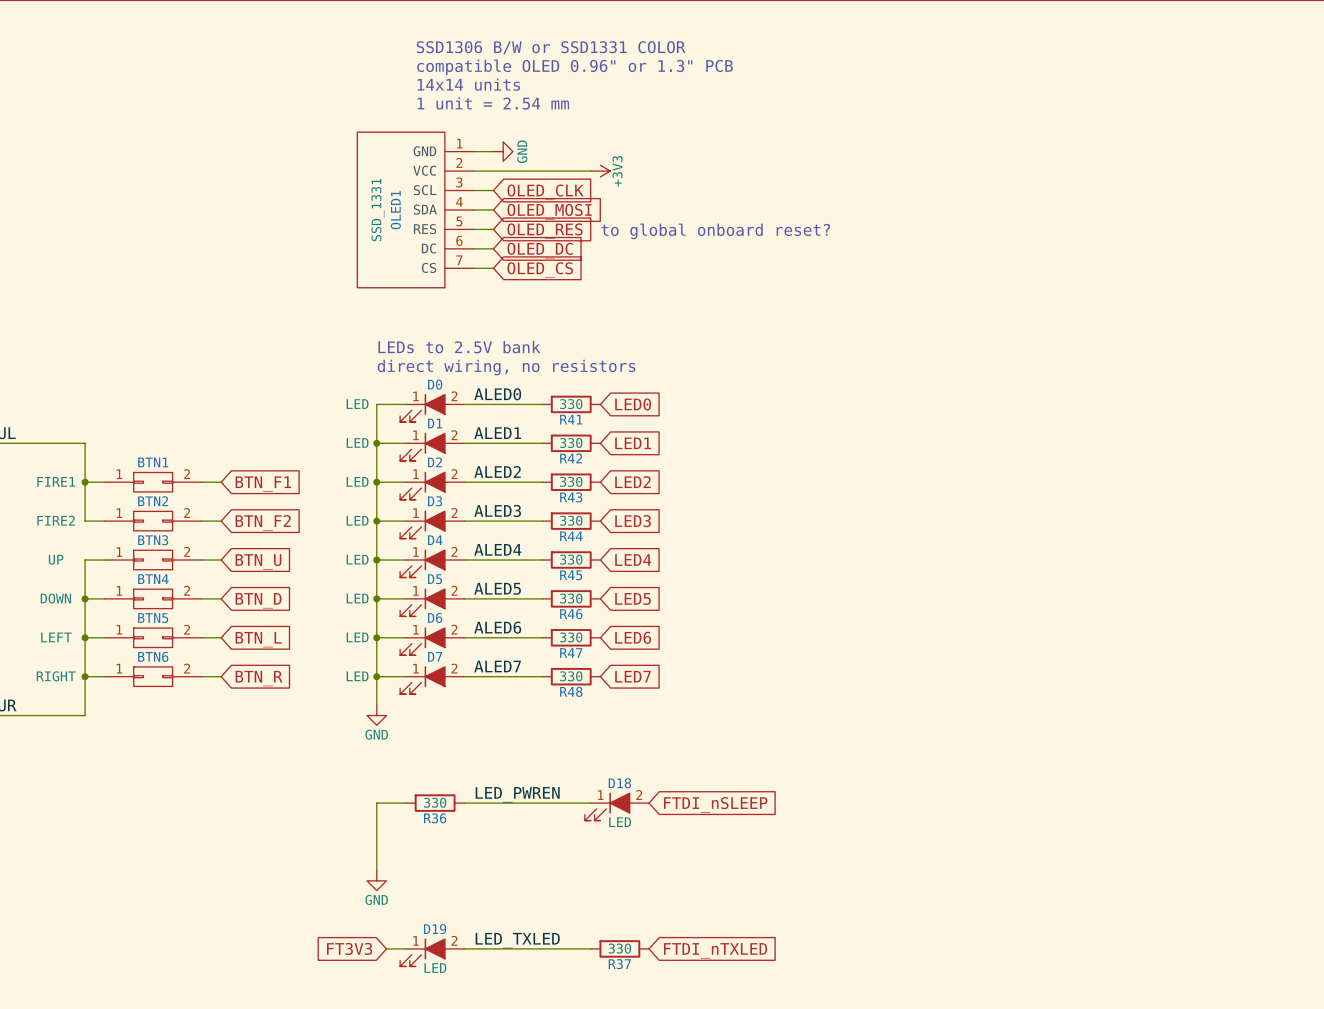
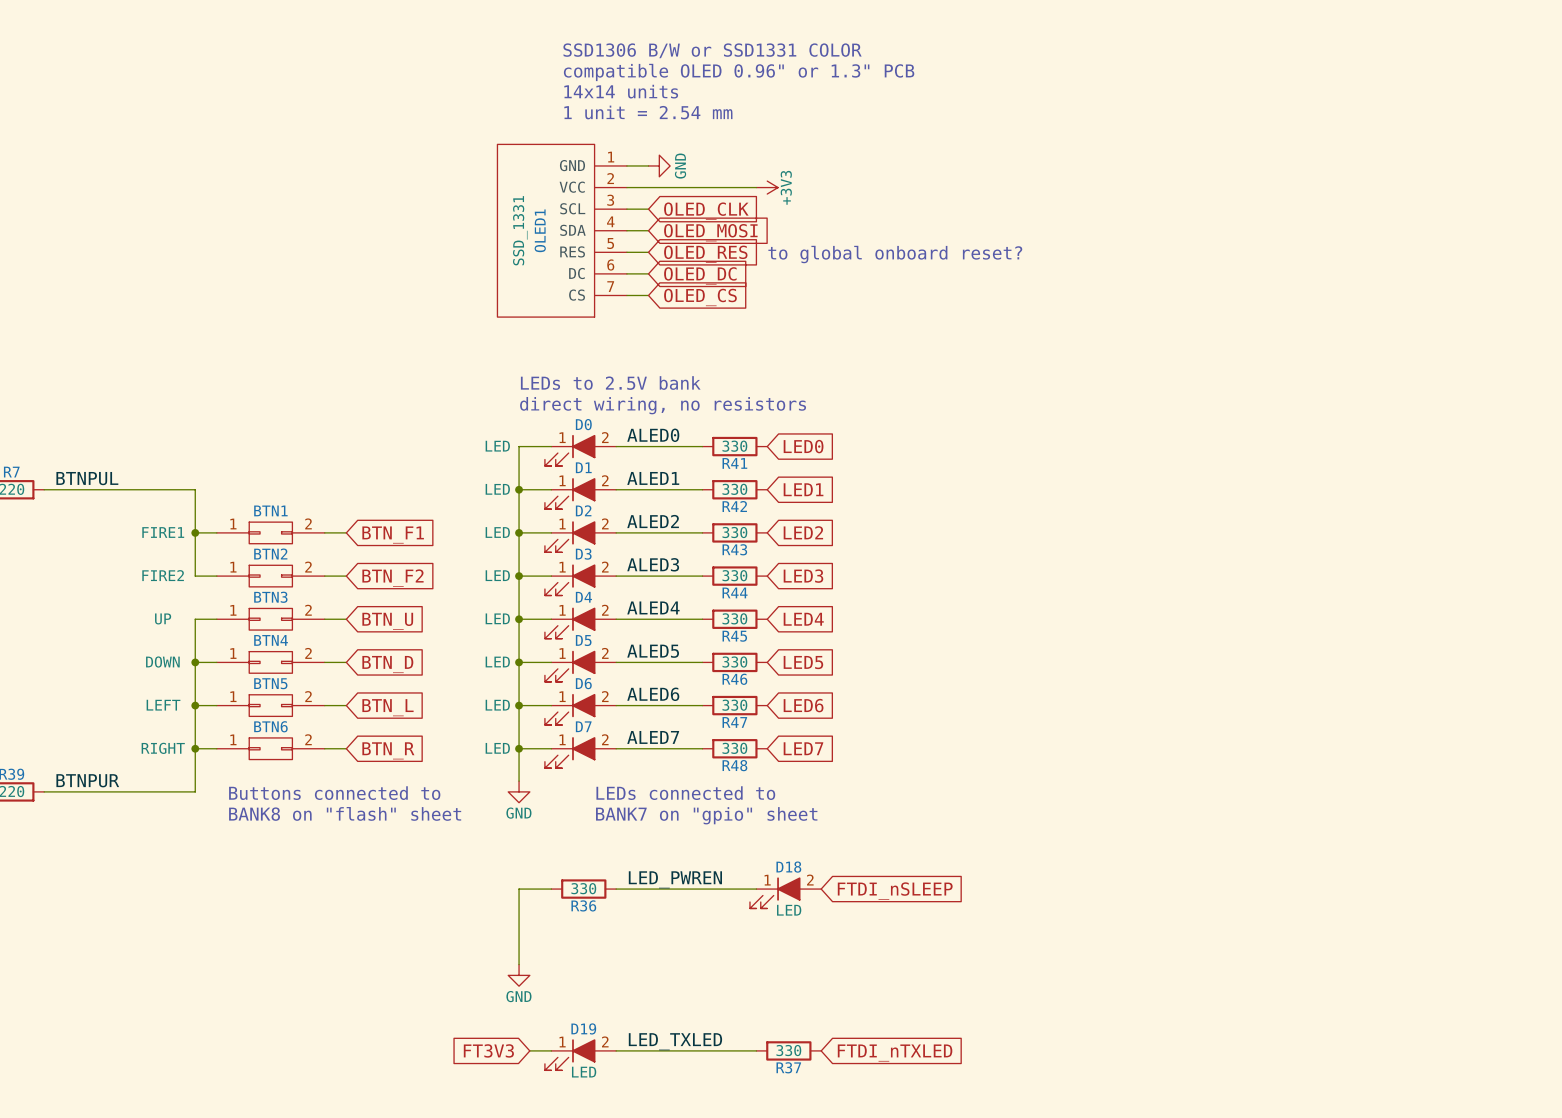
text: none -> Buttons connected to (334, 793)
text: none -> LEDs connected to (685, 793)
text: none -> BANK8 on "flash" sheet (345, 813)
text: none -> BANK7 on "gpio" sheet (706, 815)

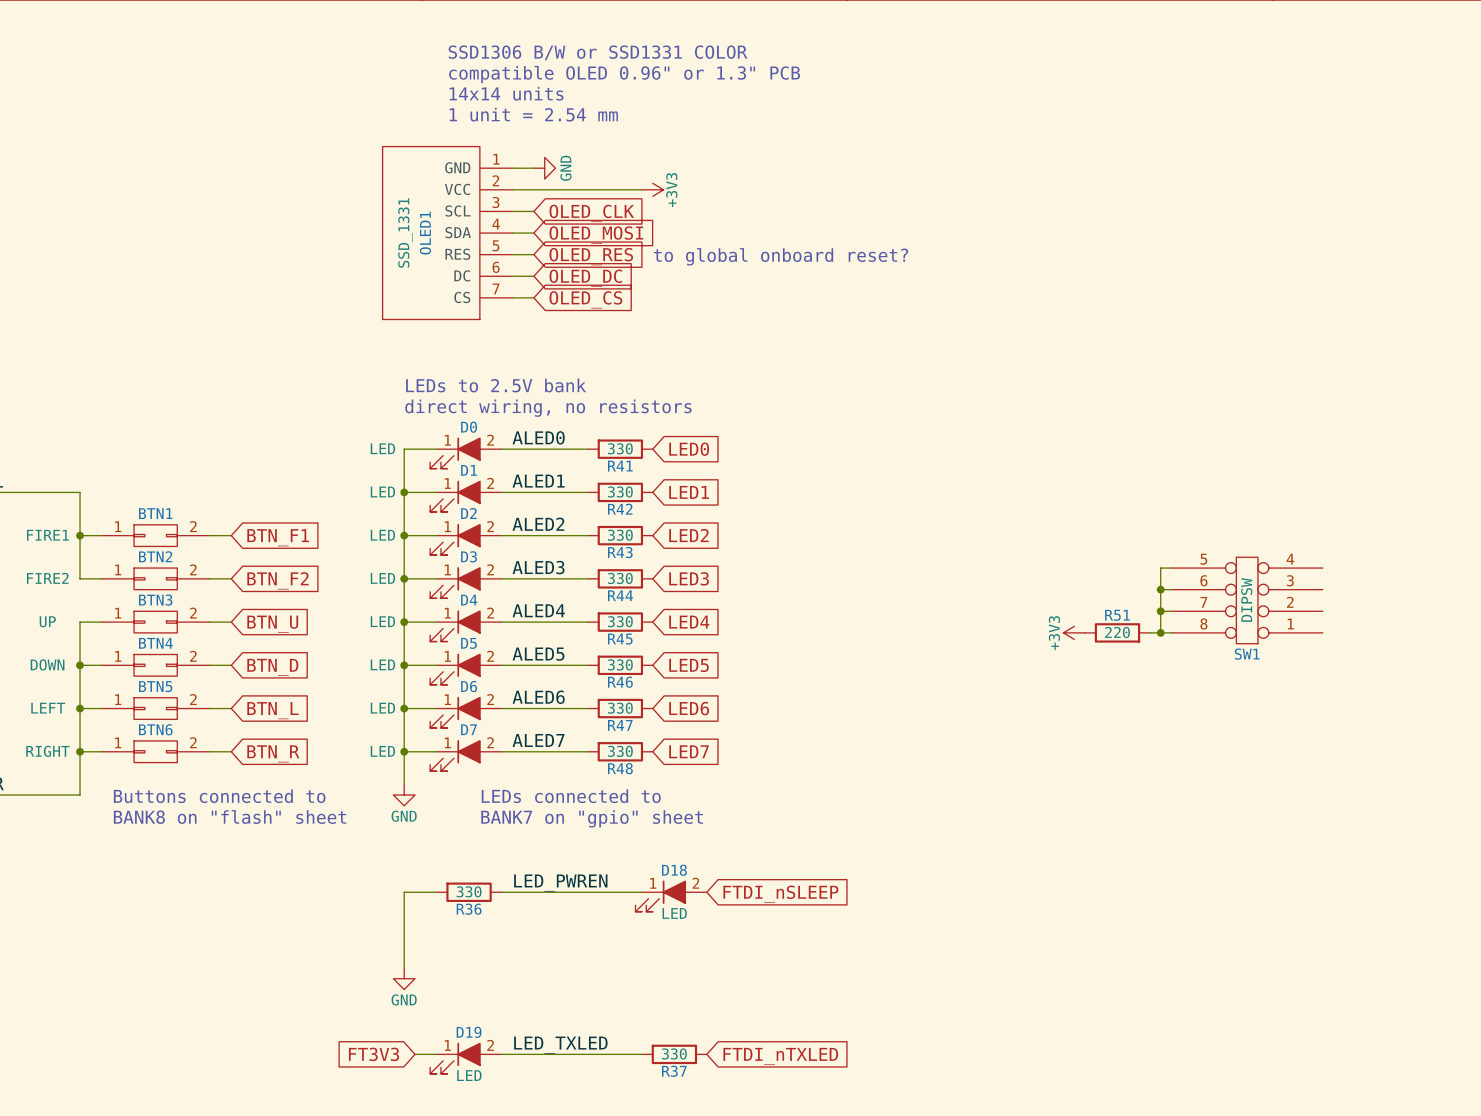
wire: none -> (1171, 568) (1160, 568) (1160, 632)
wire: none -> (1160, 589) (1171, 589)
junction: none -> (1160, 589)
SW1: none -> DIPSW (1247, 600)
wire: none -> (1160, 611) (1171, 611)
junction: none -> (1160, 611)
power symbol: none -> +3V3 (1074, 632)
R51: none -> 220 (1117, 632)
wire: none -> (1149, 632) (1171, 632)
junction: none -> (1160, 632)

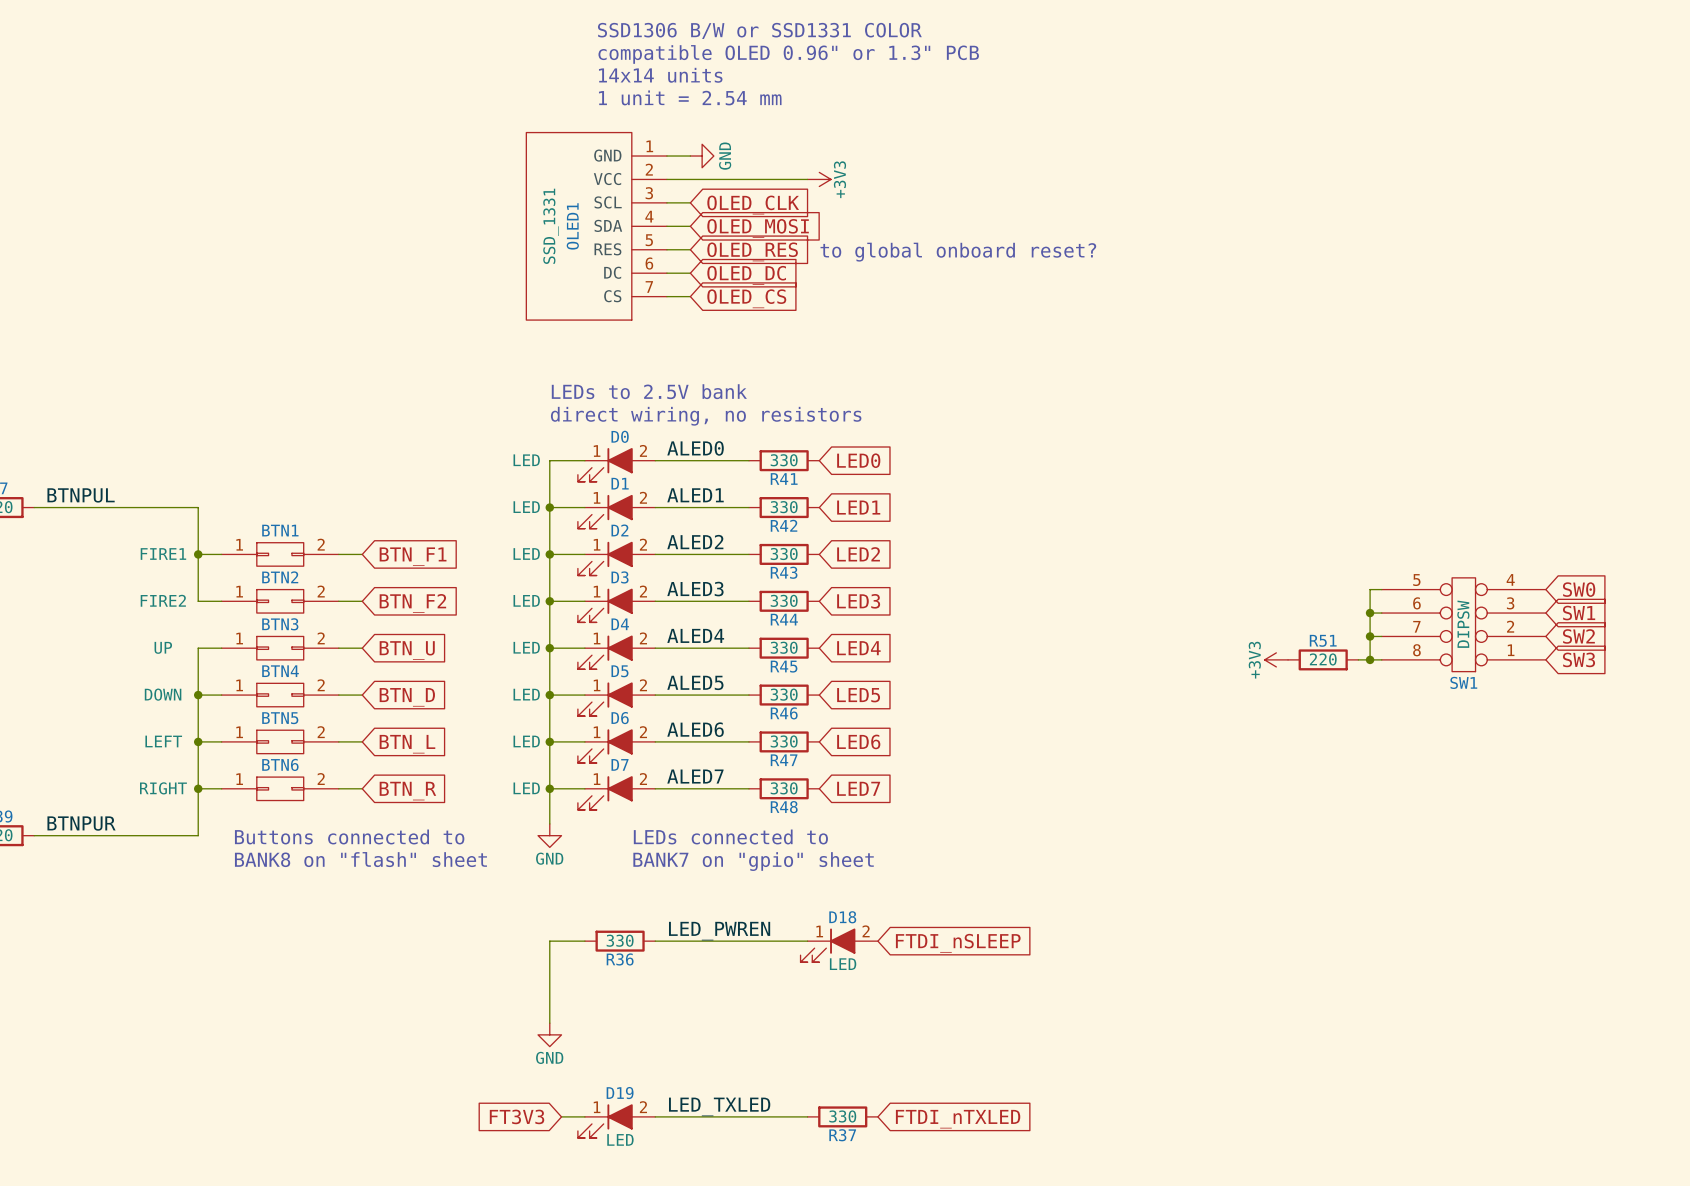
global label: none -> SW0 (1579, 589)
global label: none -> SW1 (1579, 613)
global label: none -> SW2 (1578, 636)
global label: none -> SW3 (1579, 659)

